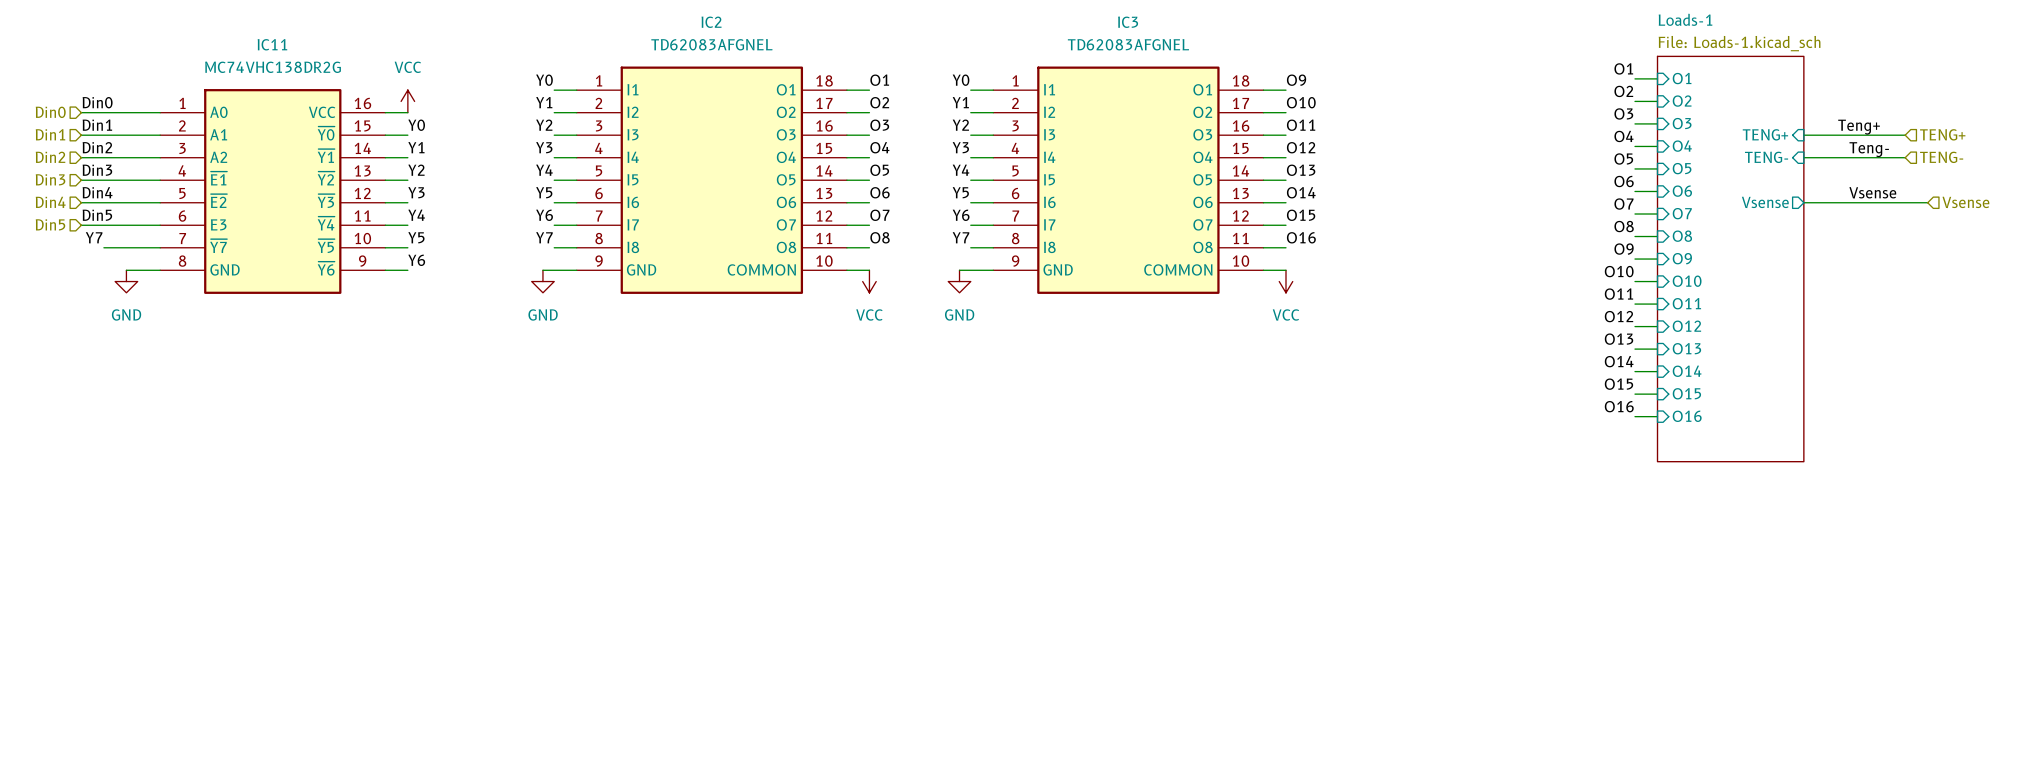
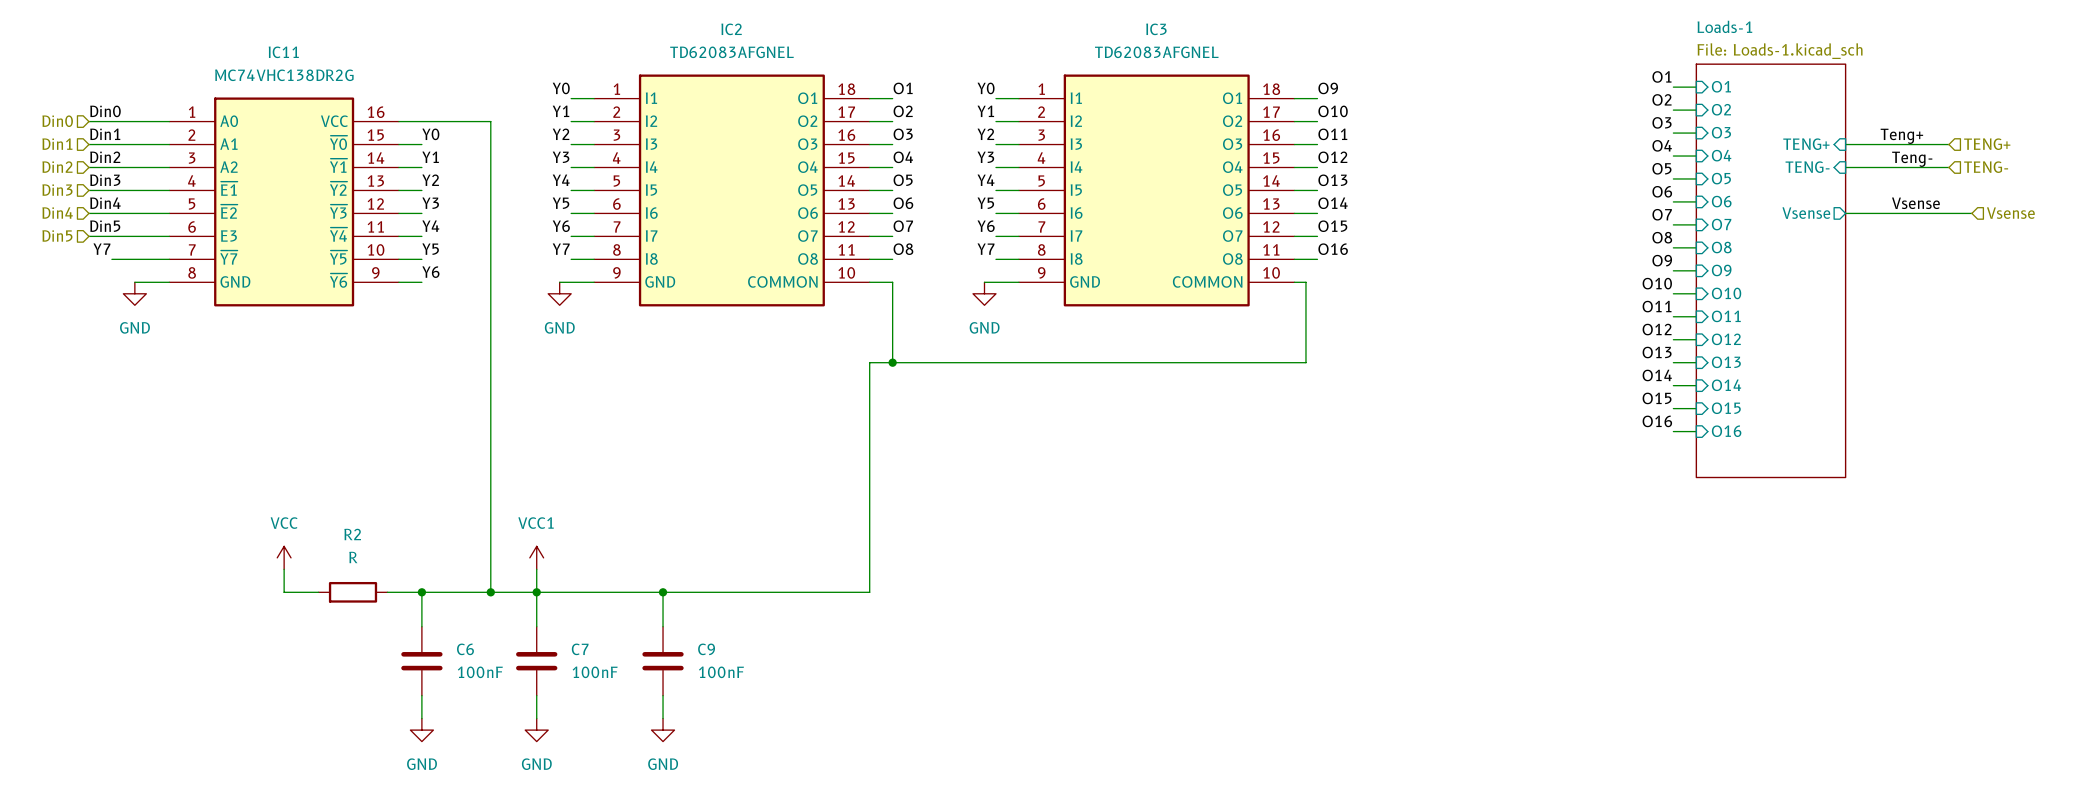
power symbol: VCC (407, 101) -> none
wire: none -> (421, 121) (490, 121) (490, 592)
wire: none -> (892, 282) (892, 362)
wire: (1274, 270) (1285, 270) -> (1305, 282) (1305, 362) (869, 362) (869, 592) (387, 592)
power symbol: VCC (869, 281) -> none
power symbol: VCC (1285, 281) -> none
junction: none -> (892, 362)
power symbol: none -> VCC (284, 557)
power symbol: none -> VCC1 (536, 557)
wire: none -> (284, 569) (284, 592) (318, 592)
wire: none -> (536, 569) (536, 626)
R2: none -> R (353, 592)
wire: none -> (421, 592) (421, 626)
junction: none -> (421, 592)
junction: none -> (490, 592)
junction: none -> (536, 592)
wire: none -> (663, 592) (663, 626)
junction: none -> (663, 592)
C6: none -> 100nF (421, 661)
C7: none -> 100nF (536, 661)
C9: none -> 100nF (663, 661)
wire: none -> (421, 695) (421, 718)
wire: none -> (536, 695) (536, 718)
wire: none -> (663, 695) (663, 718)
power symbol: none -> GND (421, 730)
power symbol: none -> GND (536, 730)
power symbol: none -> GND (663, 730)

